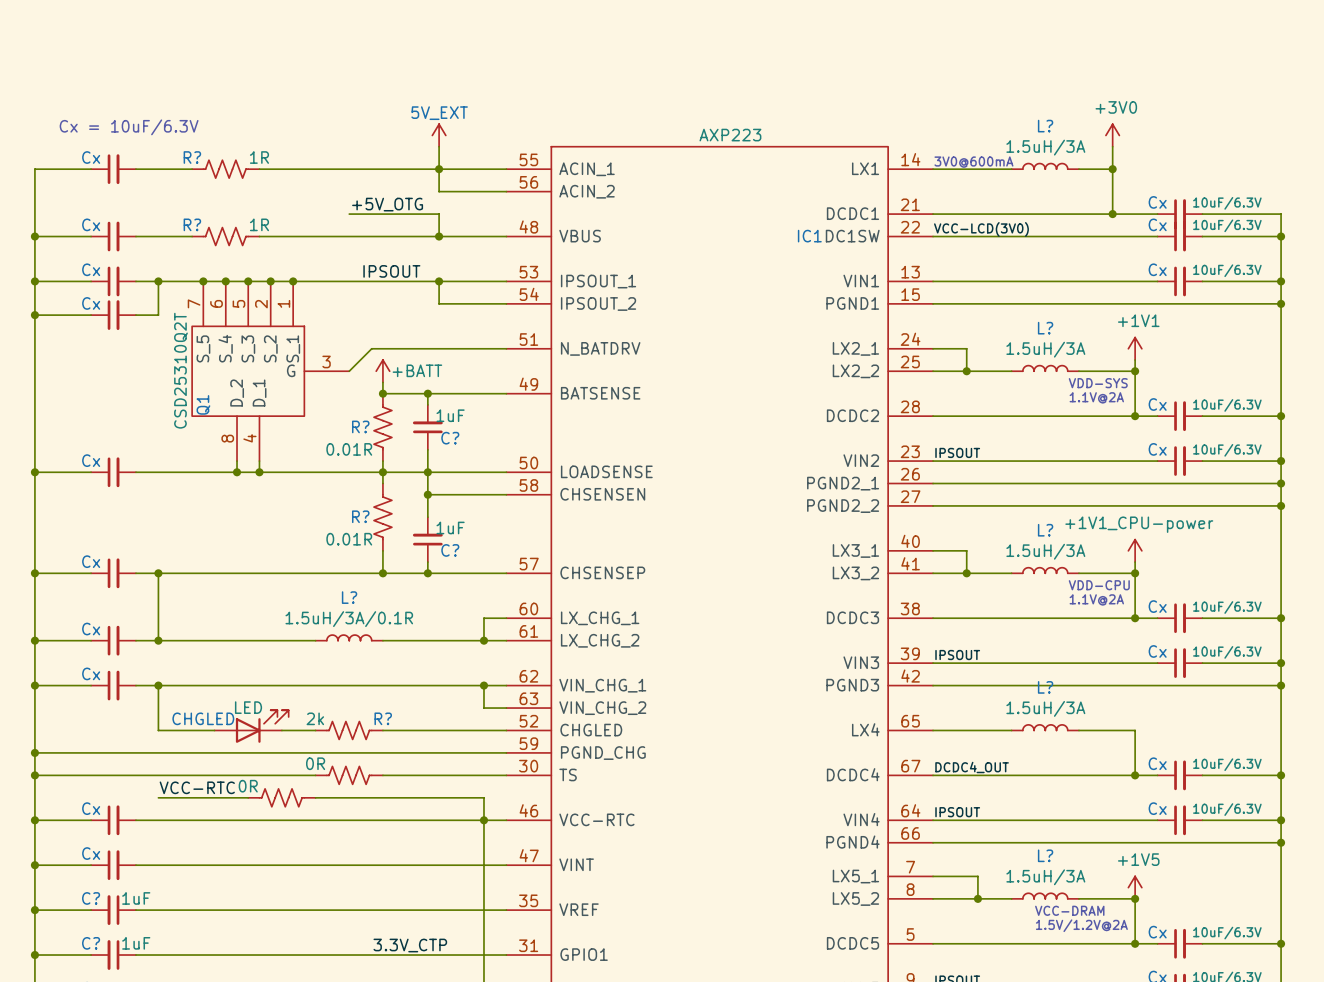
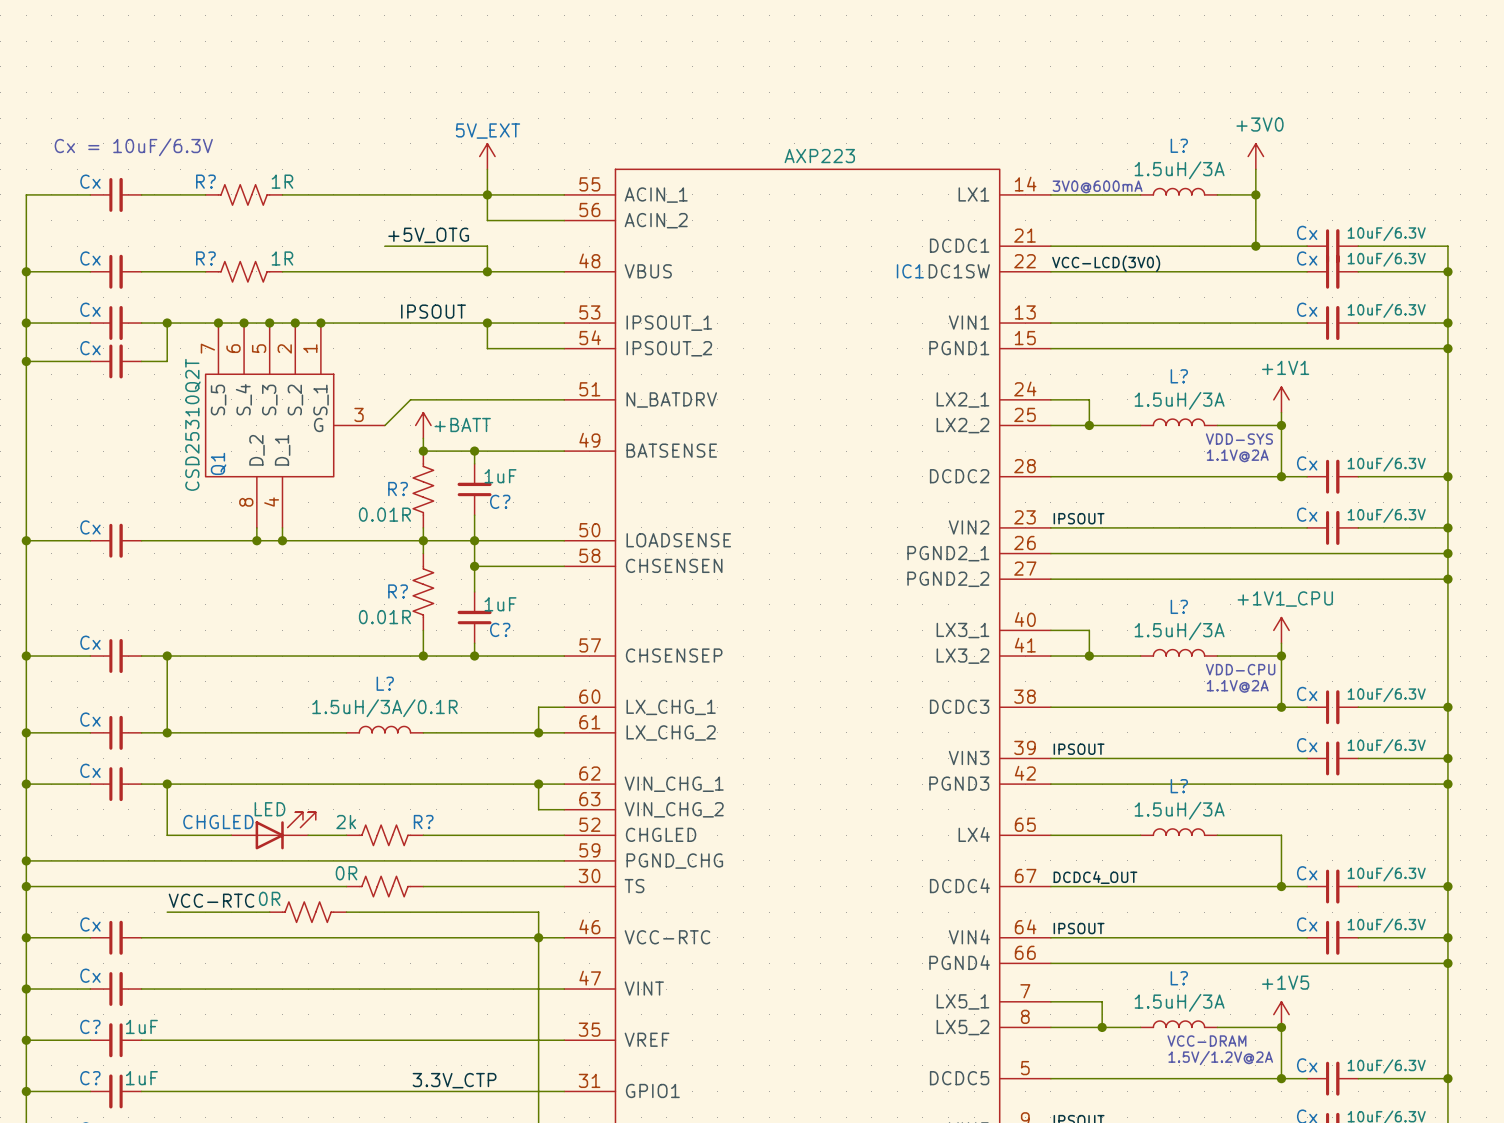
power symbol: +1V1_CPU-power (1135, 550) -> +1V1_CPU (1281, 630)

